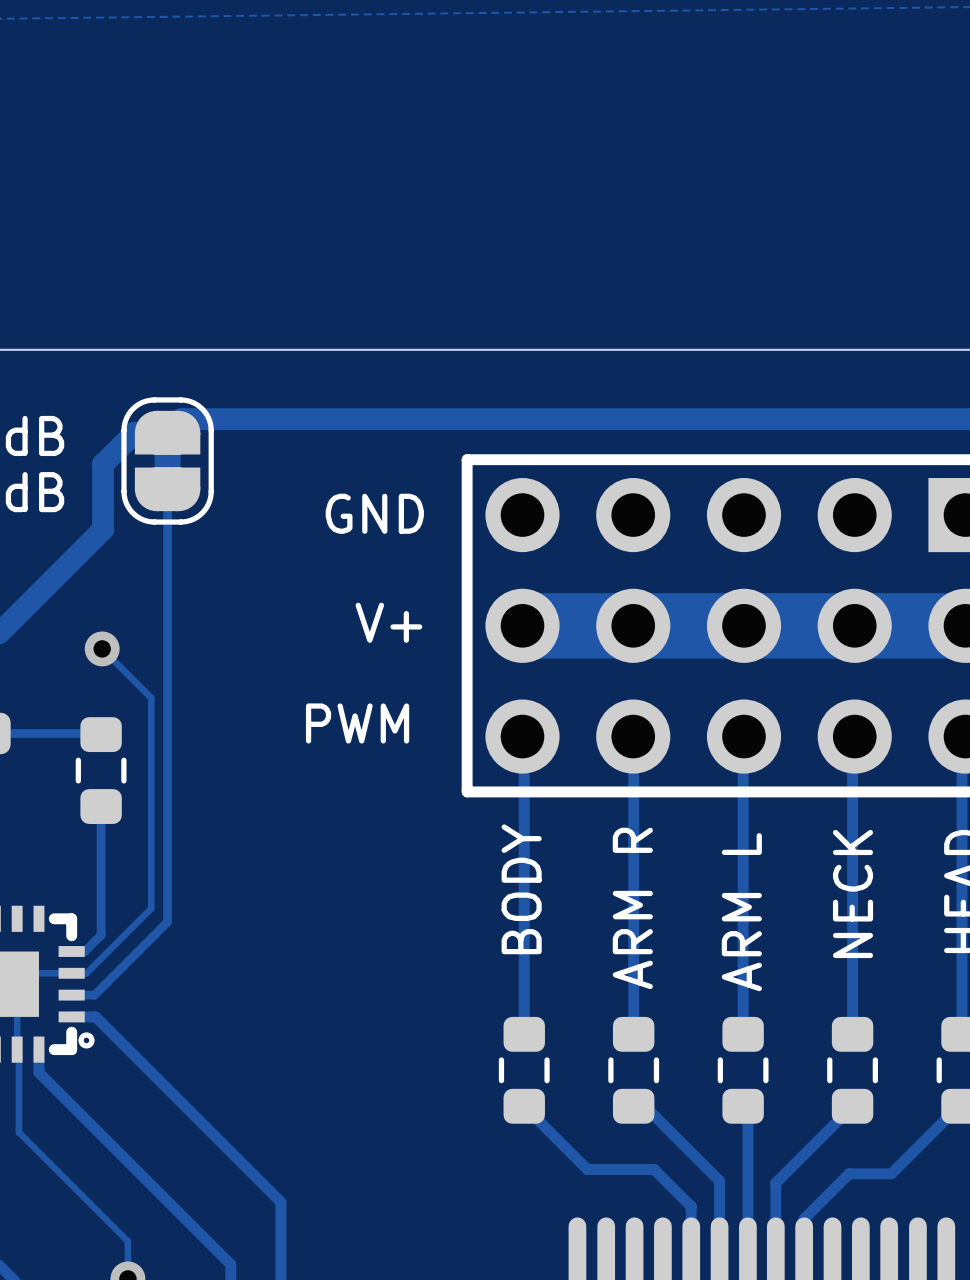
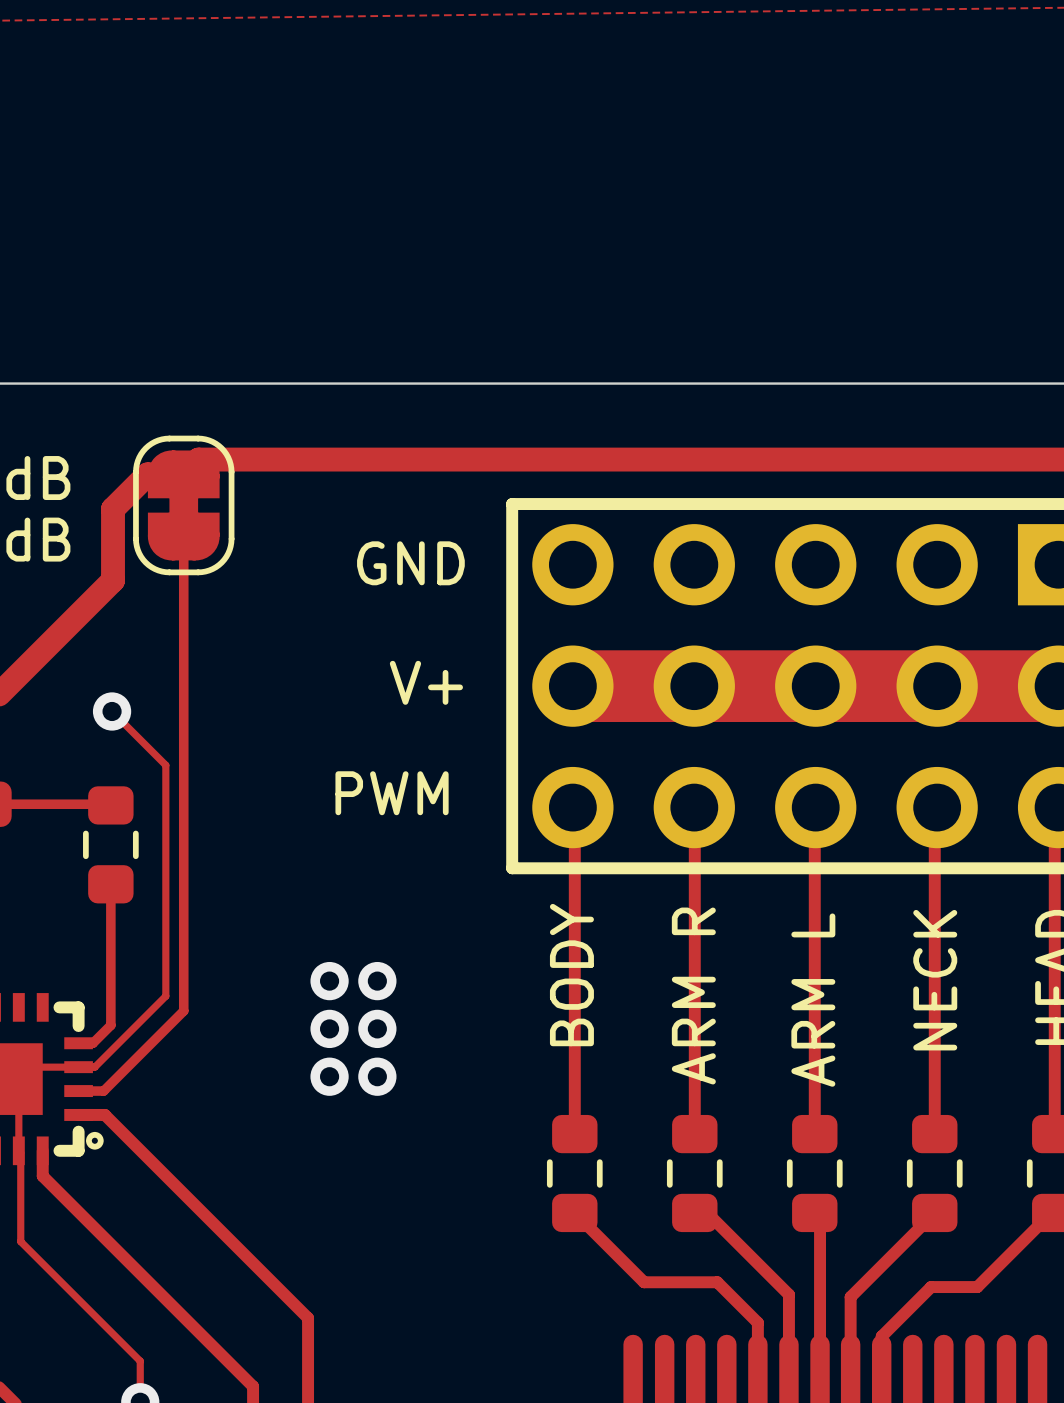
via: none -> (329, 981)
via: none -> (377, 981)
via: none -> (329, 1028)
via: none -> (377, 1028)
via: none -> (329, 1076)
via: none -> (377, 1076)

